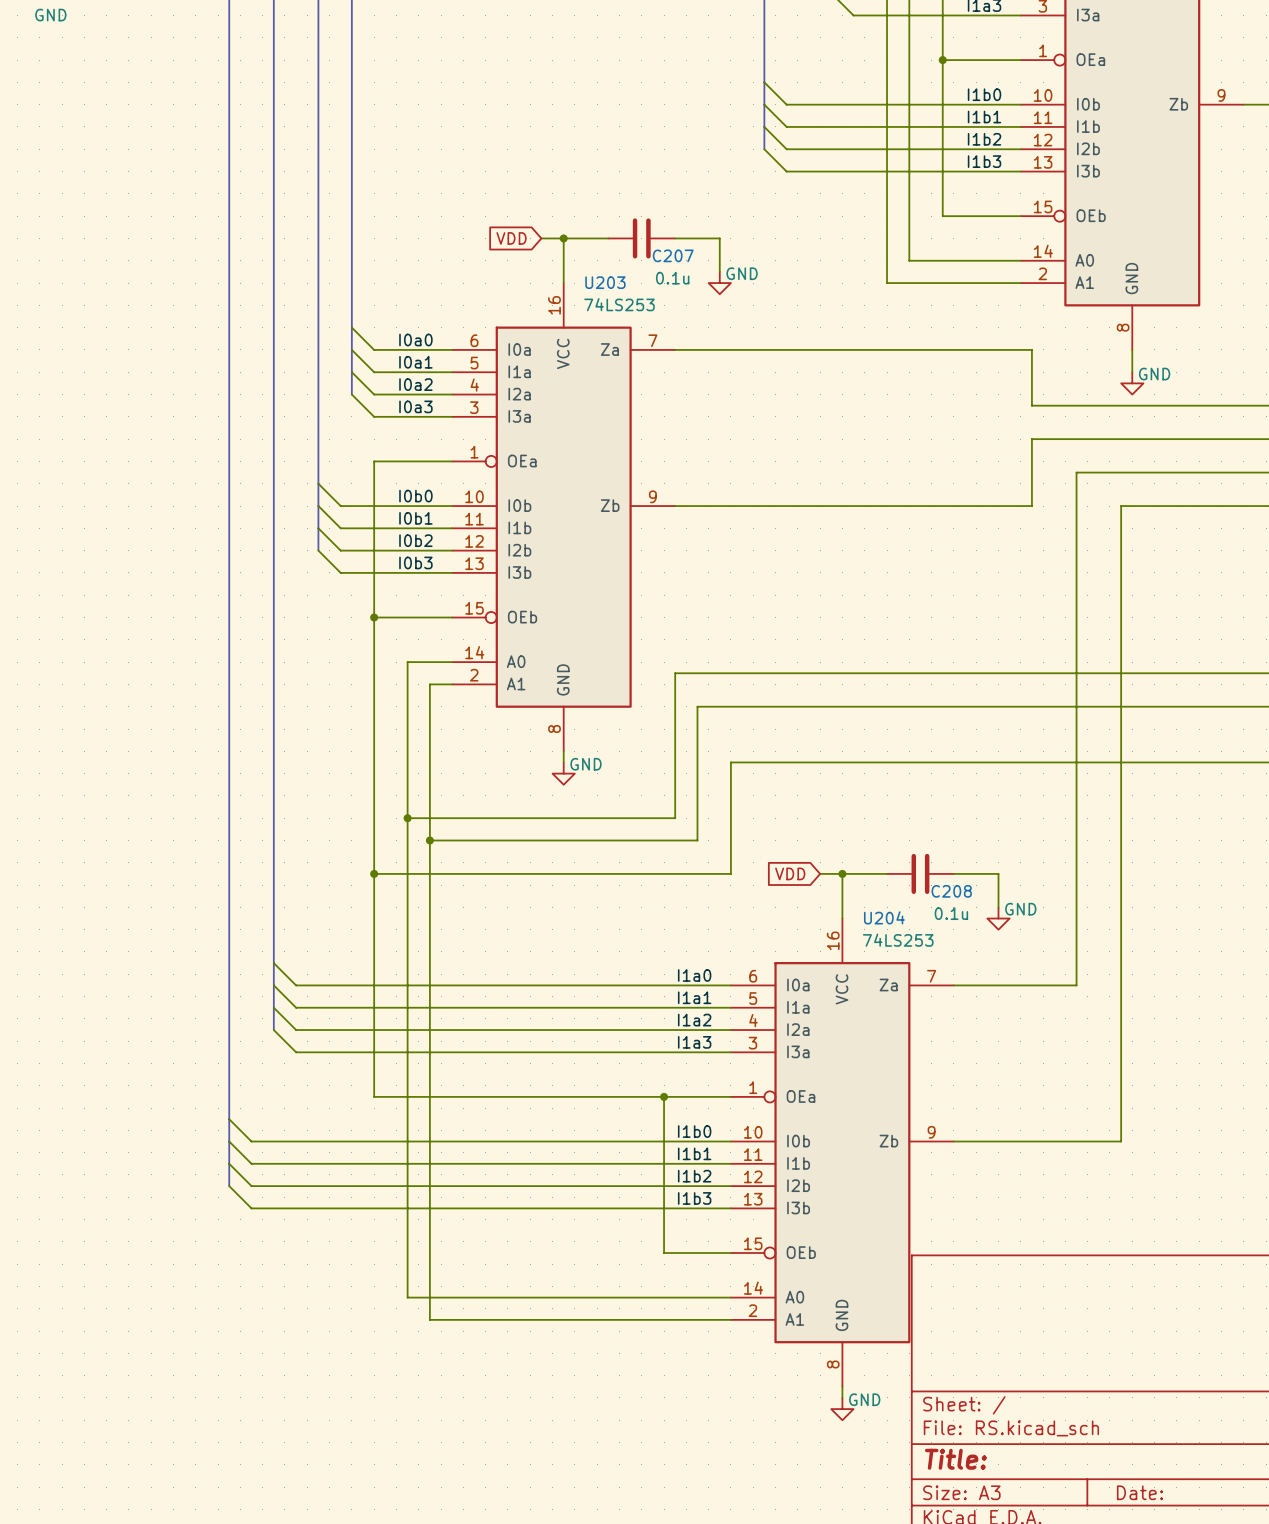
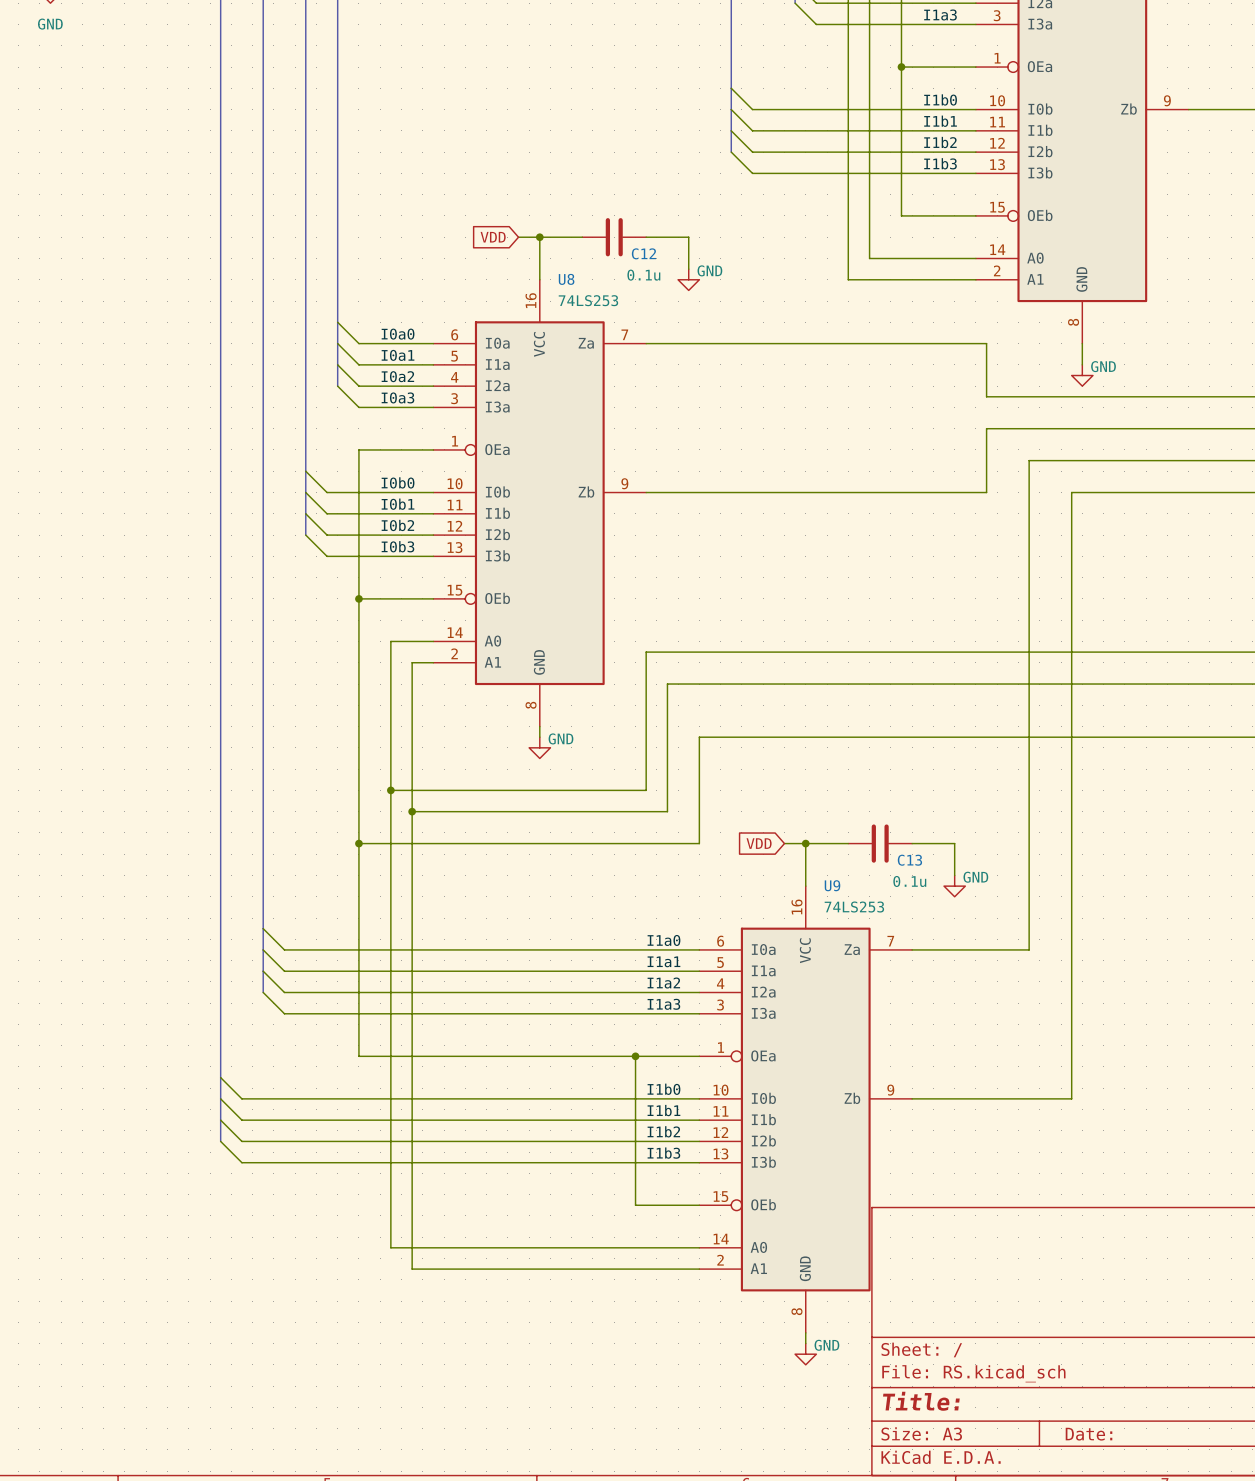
C207 name: C207 (673, 255) -> C12 (643, 253)
U203 name: U203 (605, 282) -> U8 (566, 279)
C208 name: C208 (951, 891) -> C13 (909, 860)
U204 name: U204 (884, 917) -> U9 (832, 885)

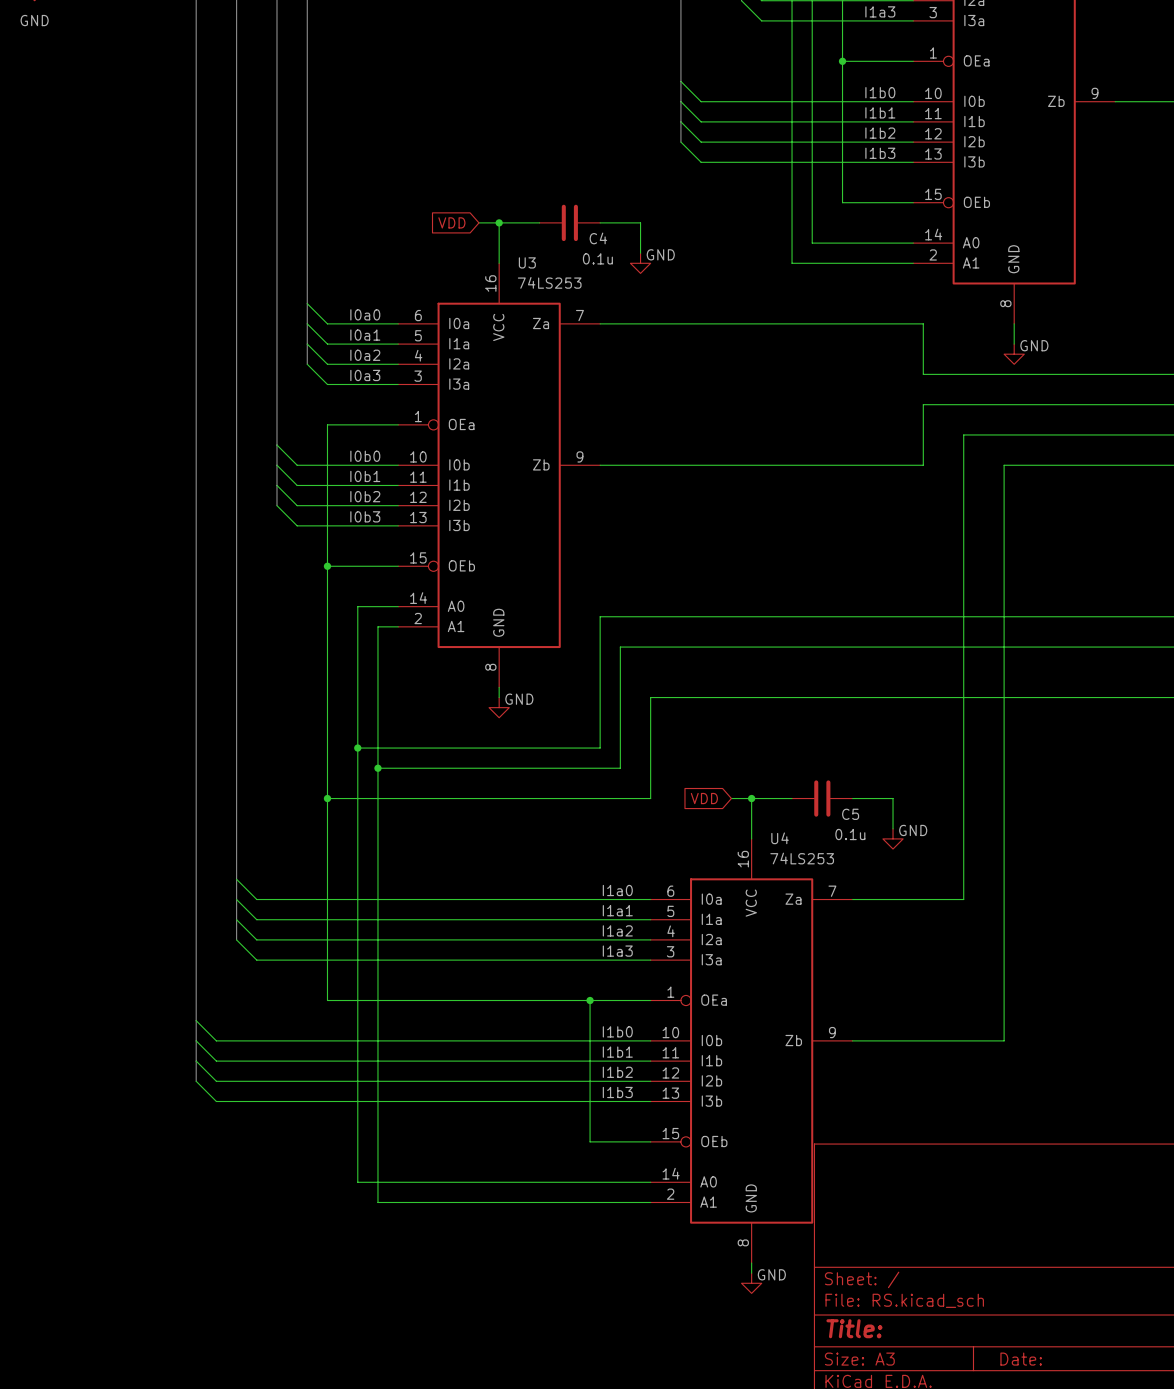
C12 name: C12 (643, 253) -> C4 (598, 238)
U8 name: U8 (566, 279) -> U3 (527, 262)
C13 name: C13 (909, 860) -> C5 (850, 814)
U9 name: U9 (832, 885) -> U4 (780, 838)

